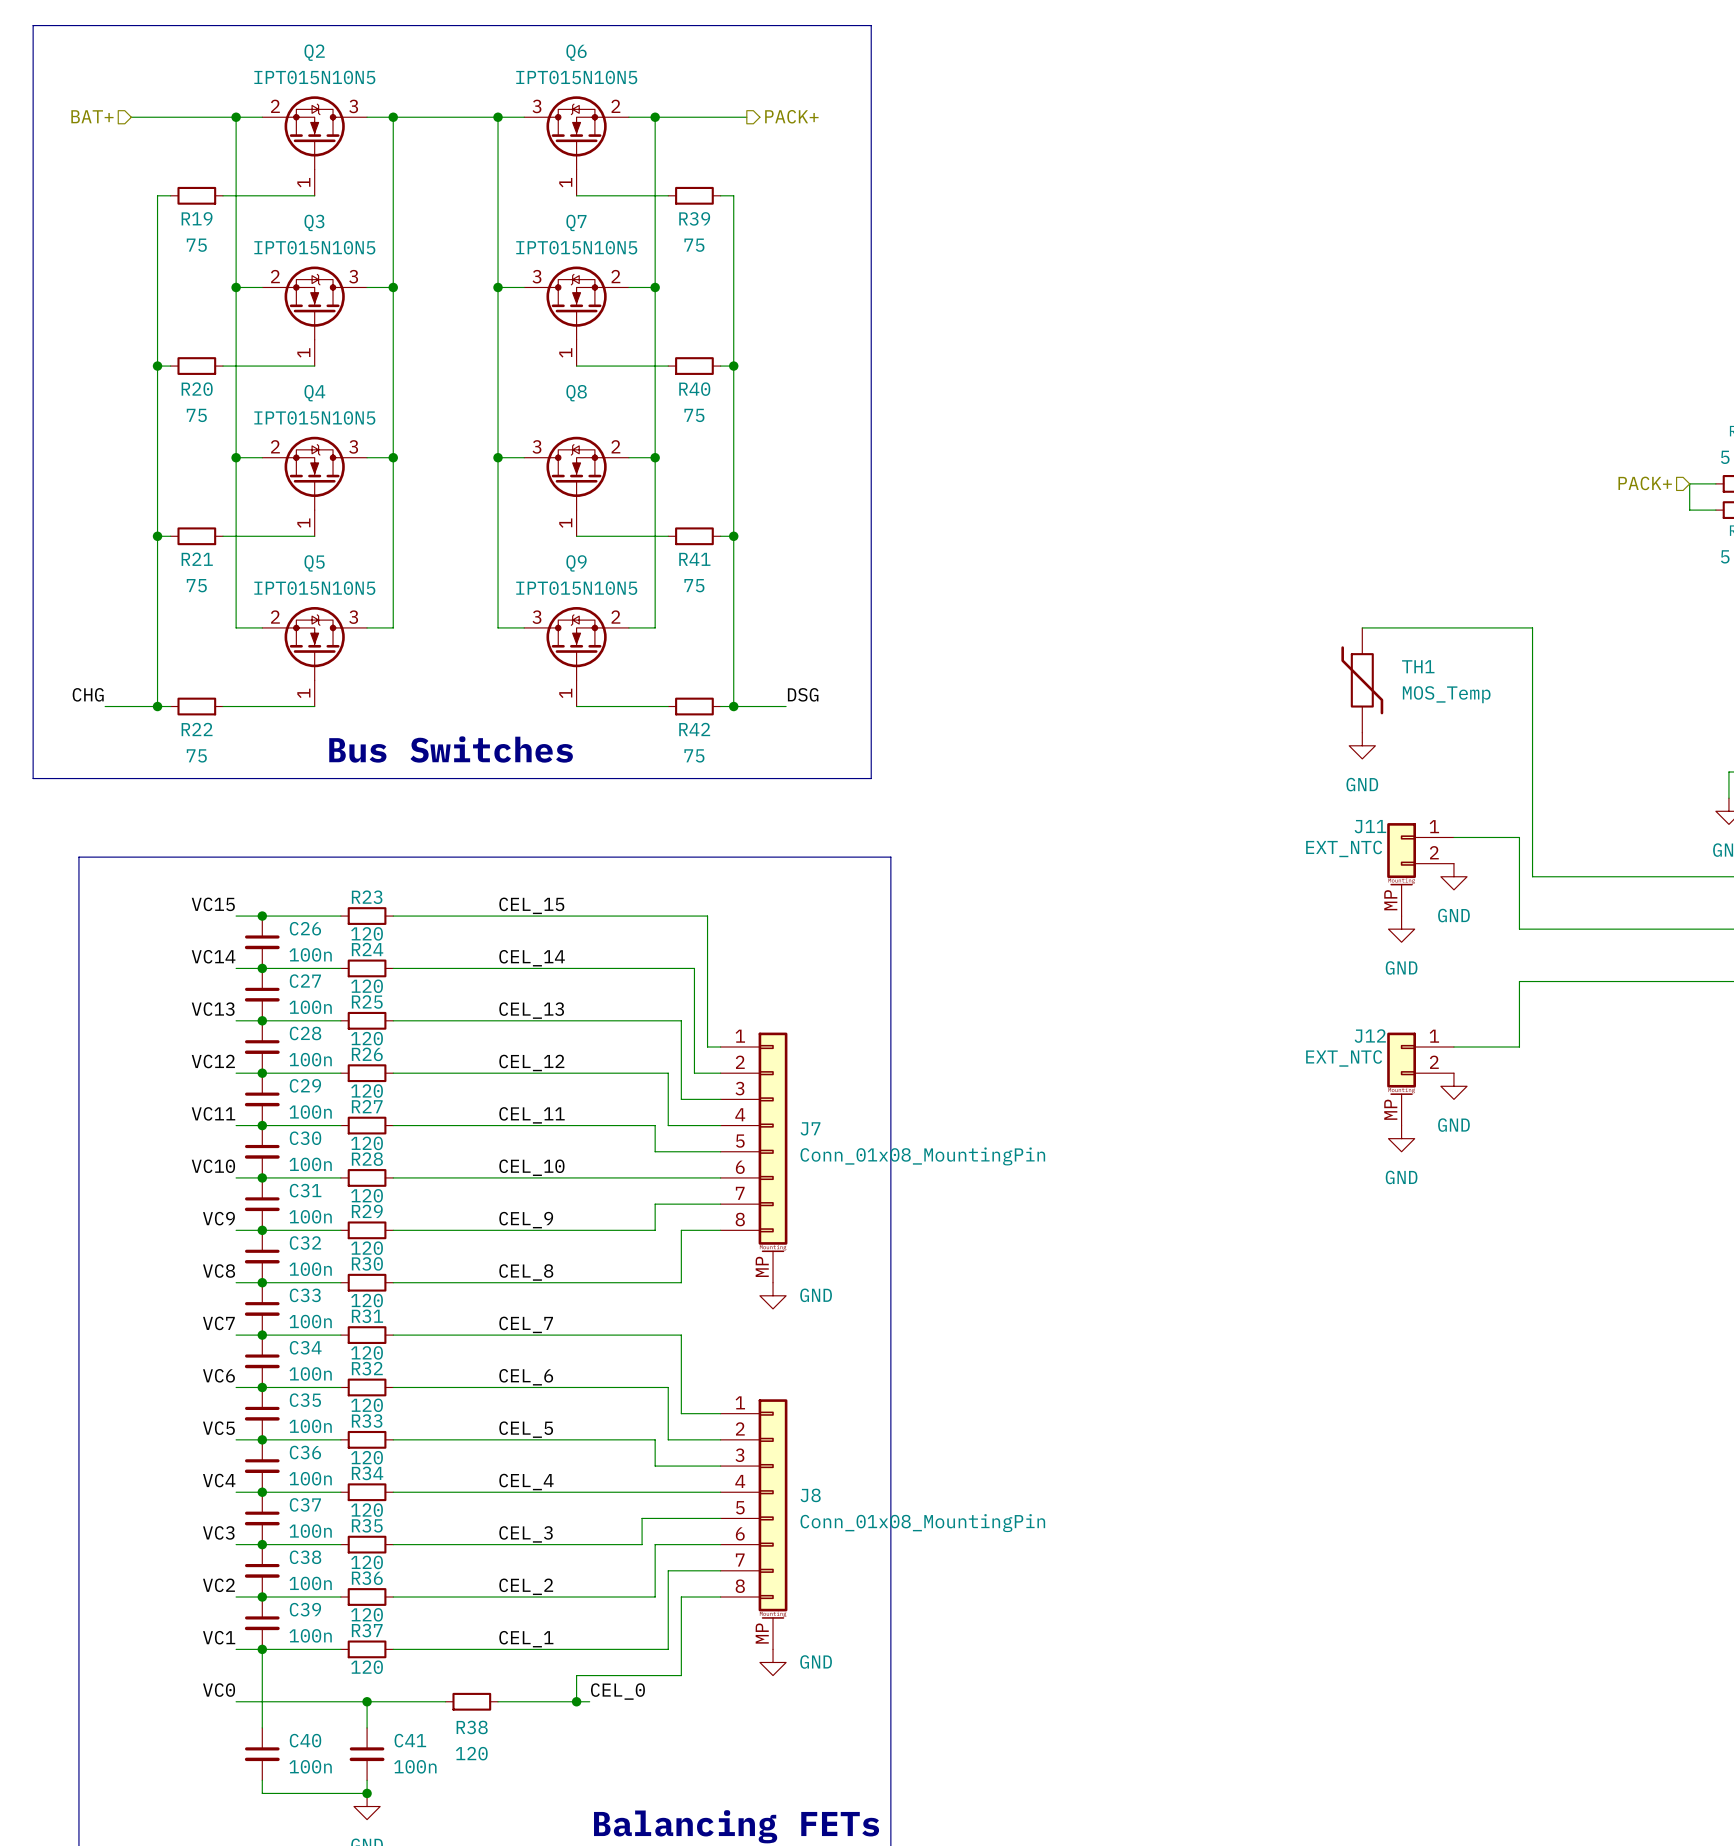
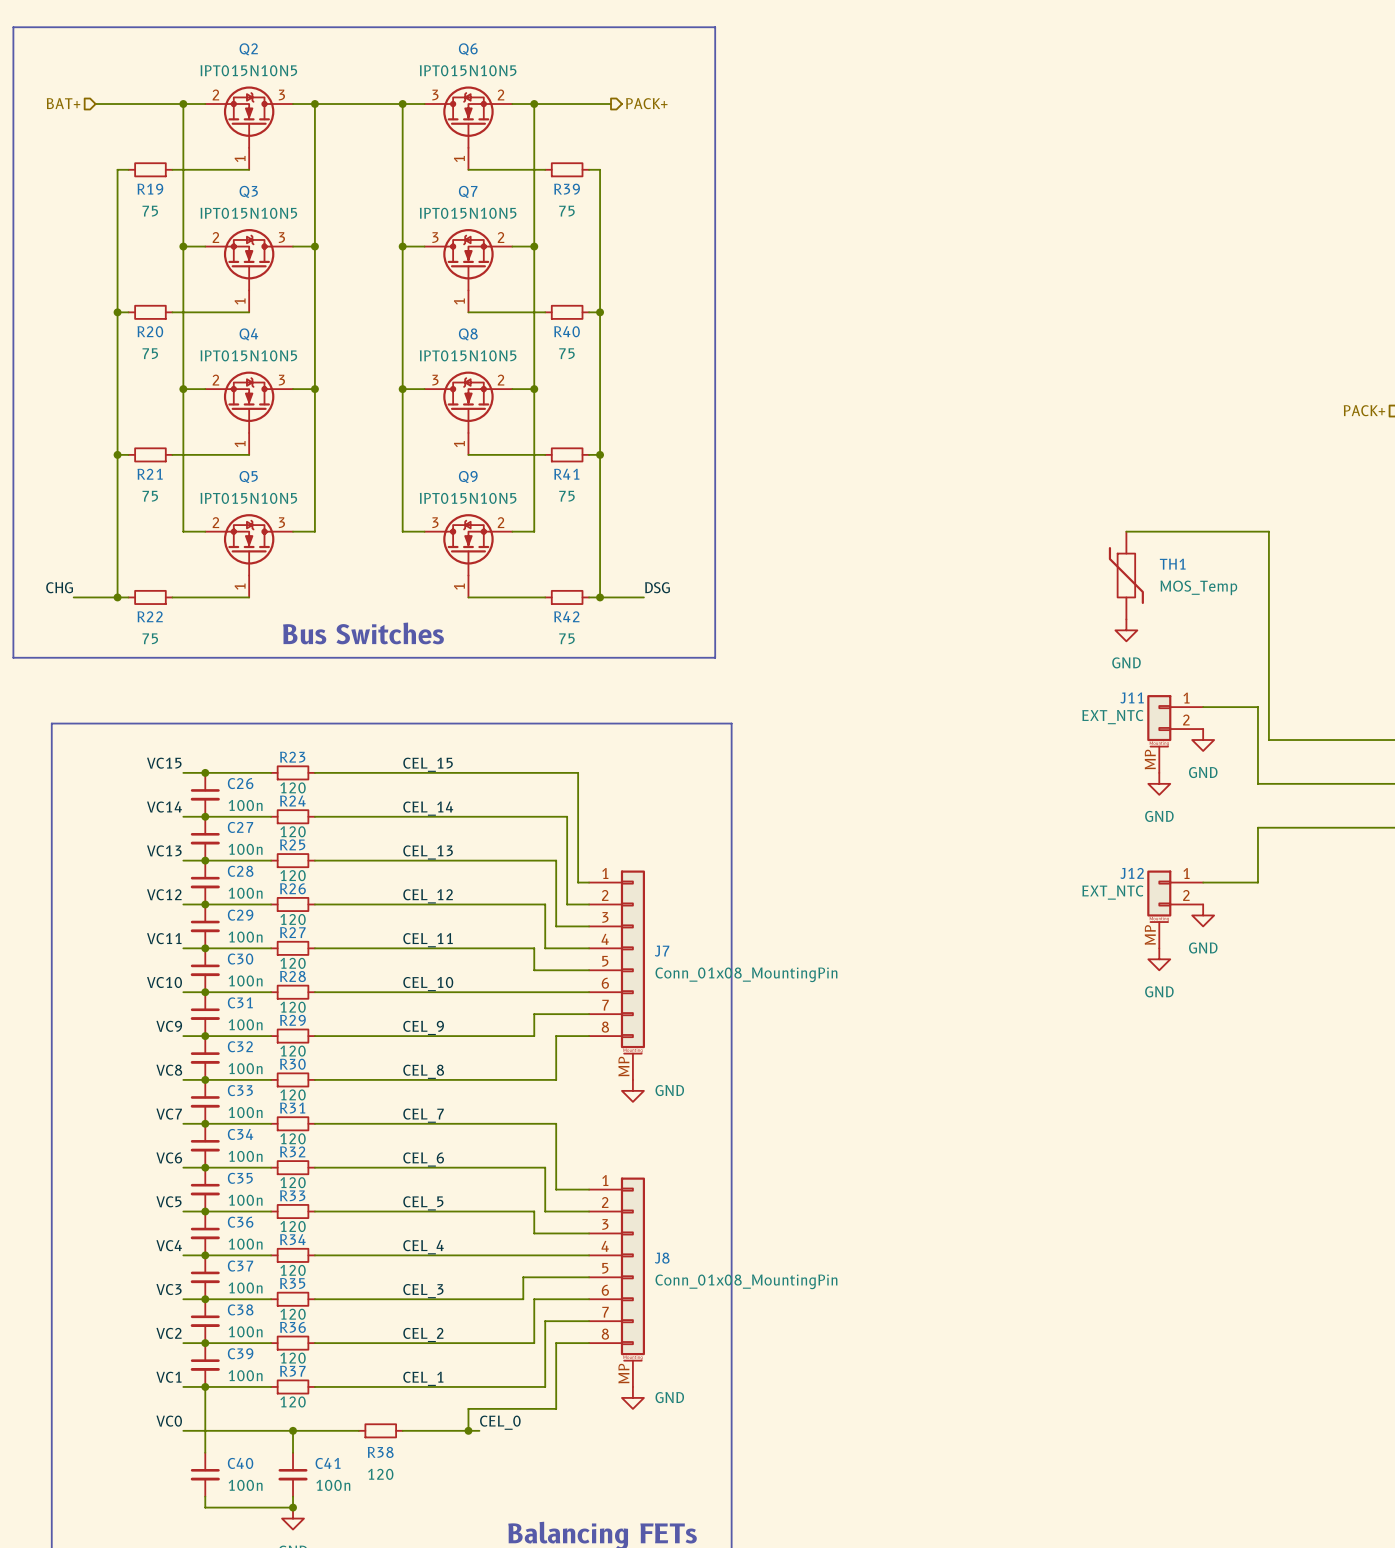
Q8 value: none -> IPT015N10N5 (468, 355)

